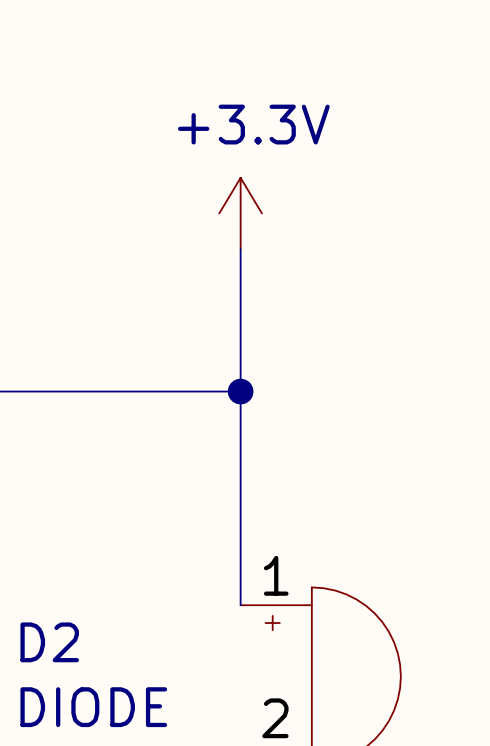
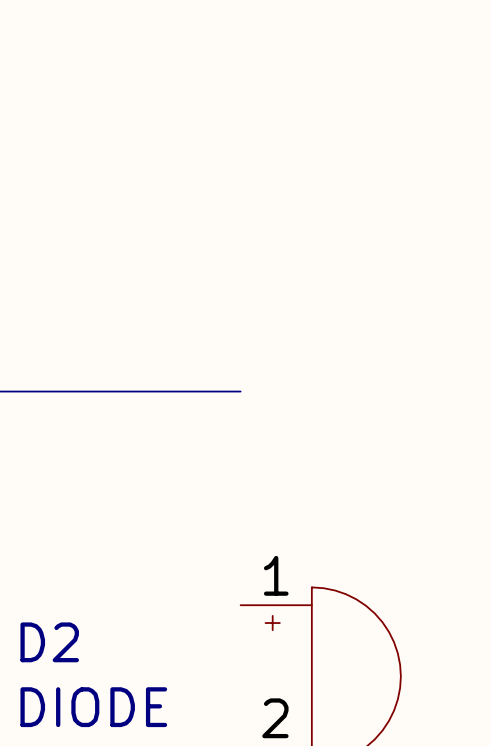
power symbol: +3.3V (240, 213) -> none
wire: (240, 249) (240, 605) -> none
junction: (240, 391) -> none

